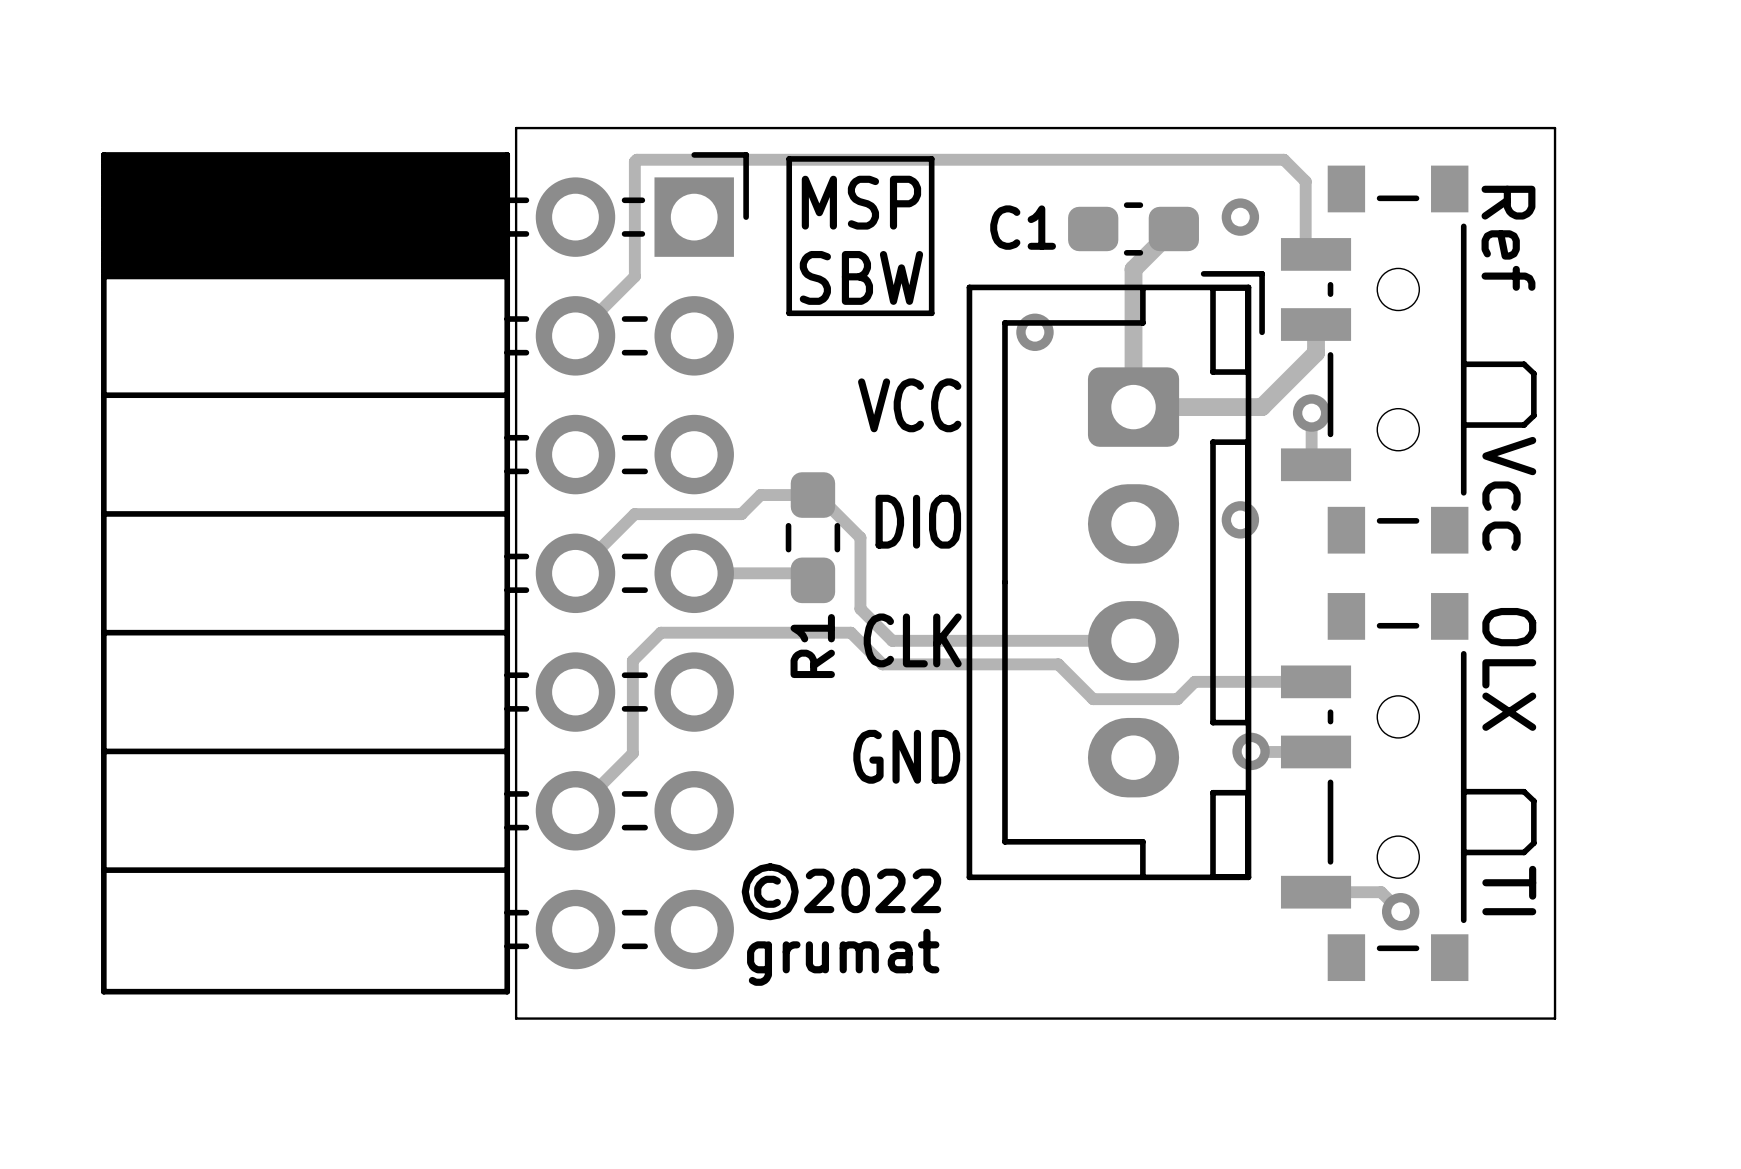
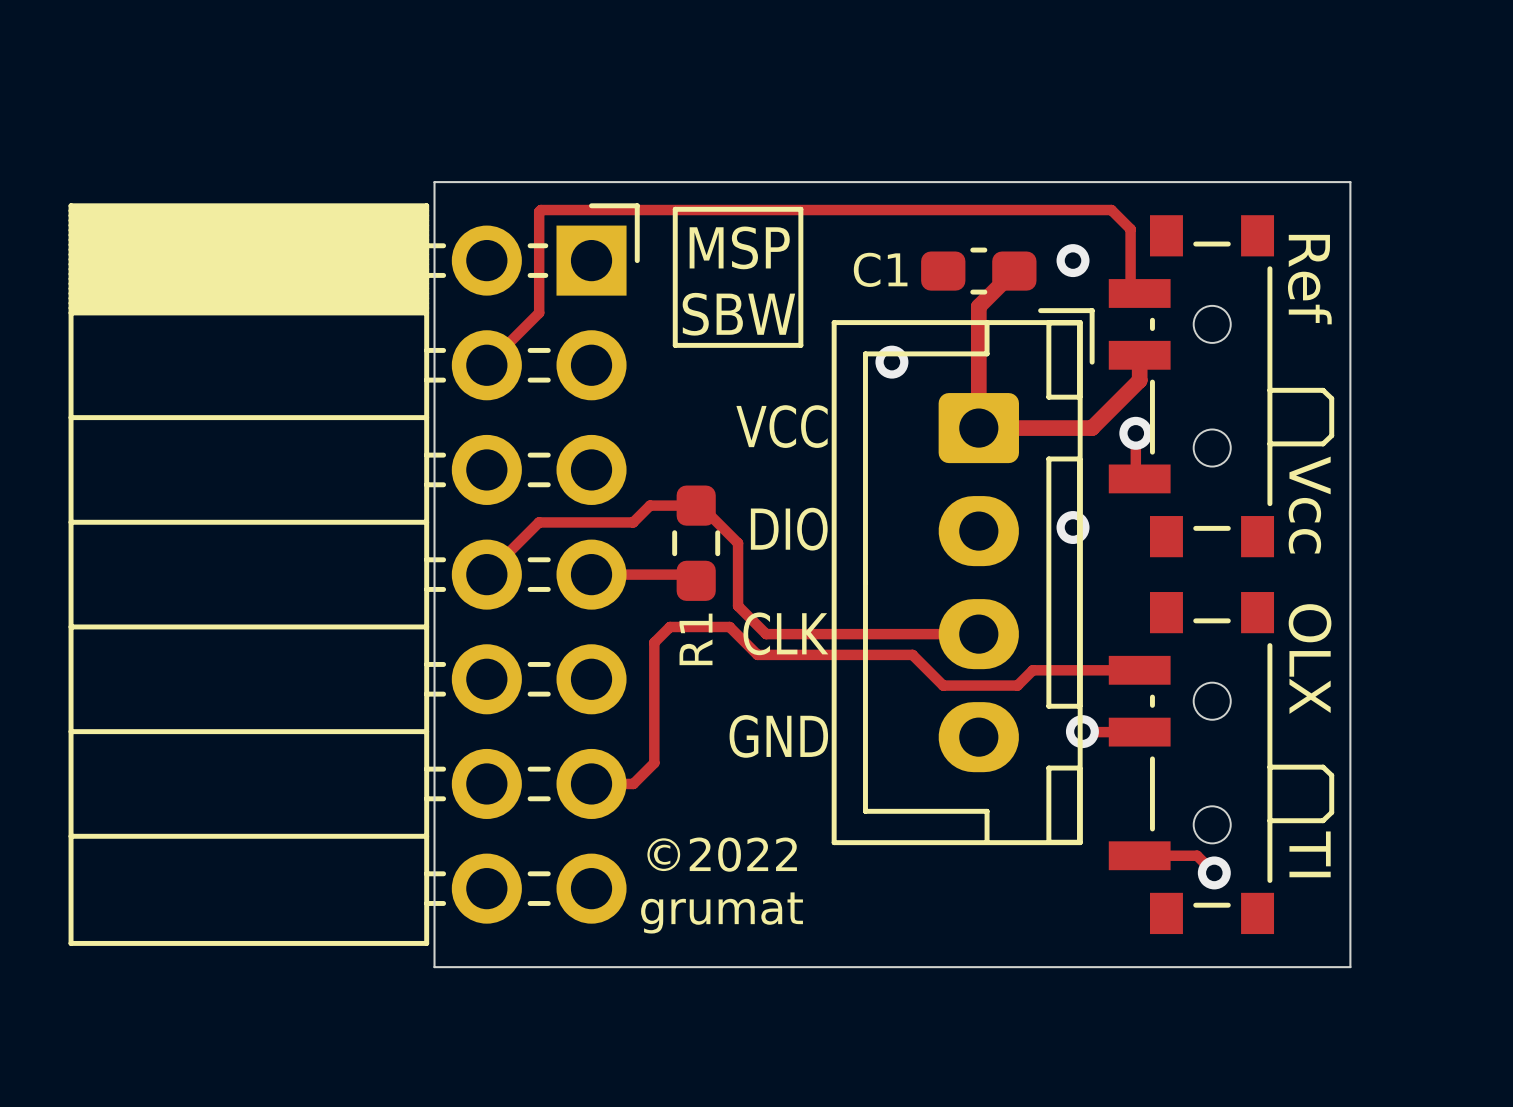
track: (783, 632) (660, 632) (632, 660) (632, 753) (575, 810) -> (669, 626) (654, 642) (654, 763) (633, 783) (591, 783)

